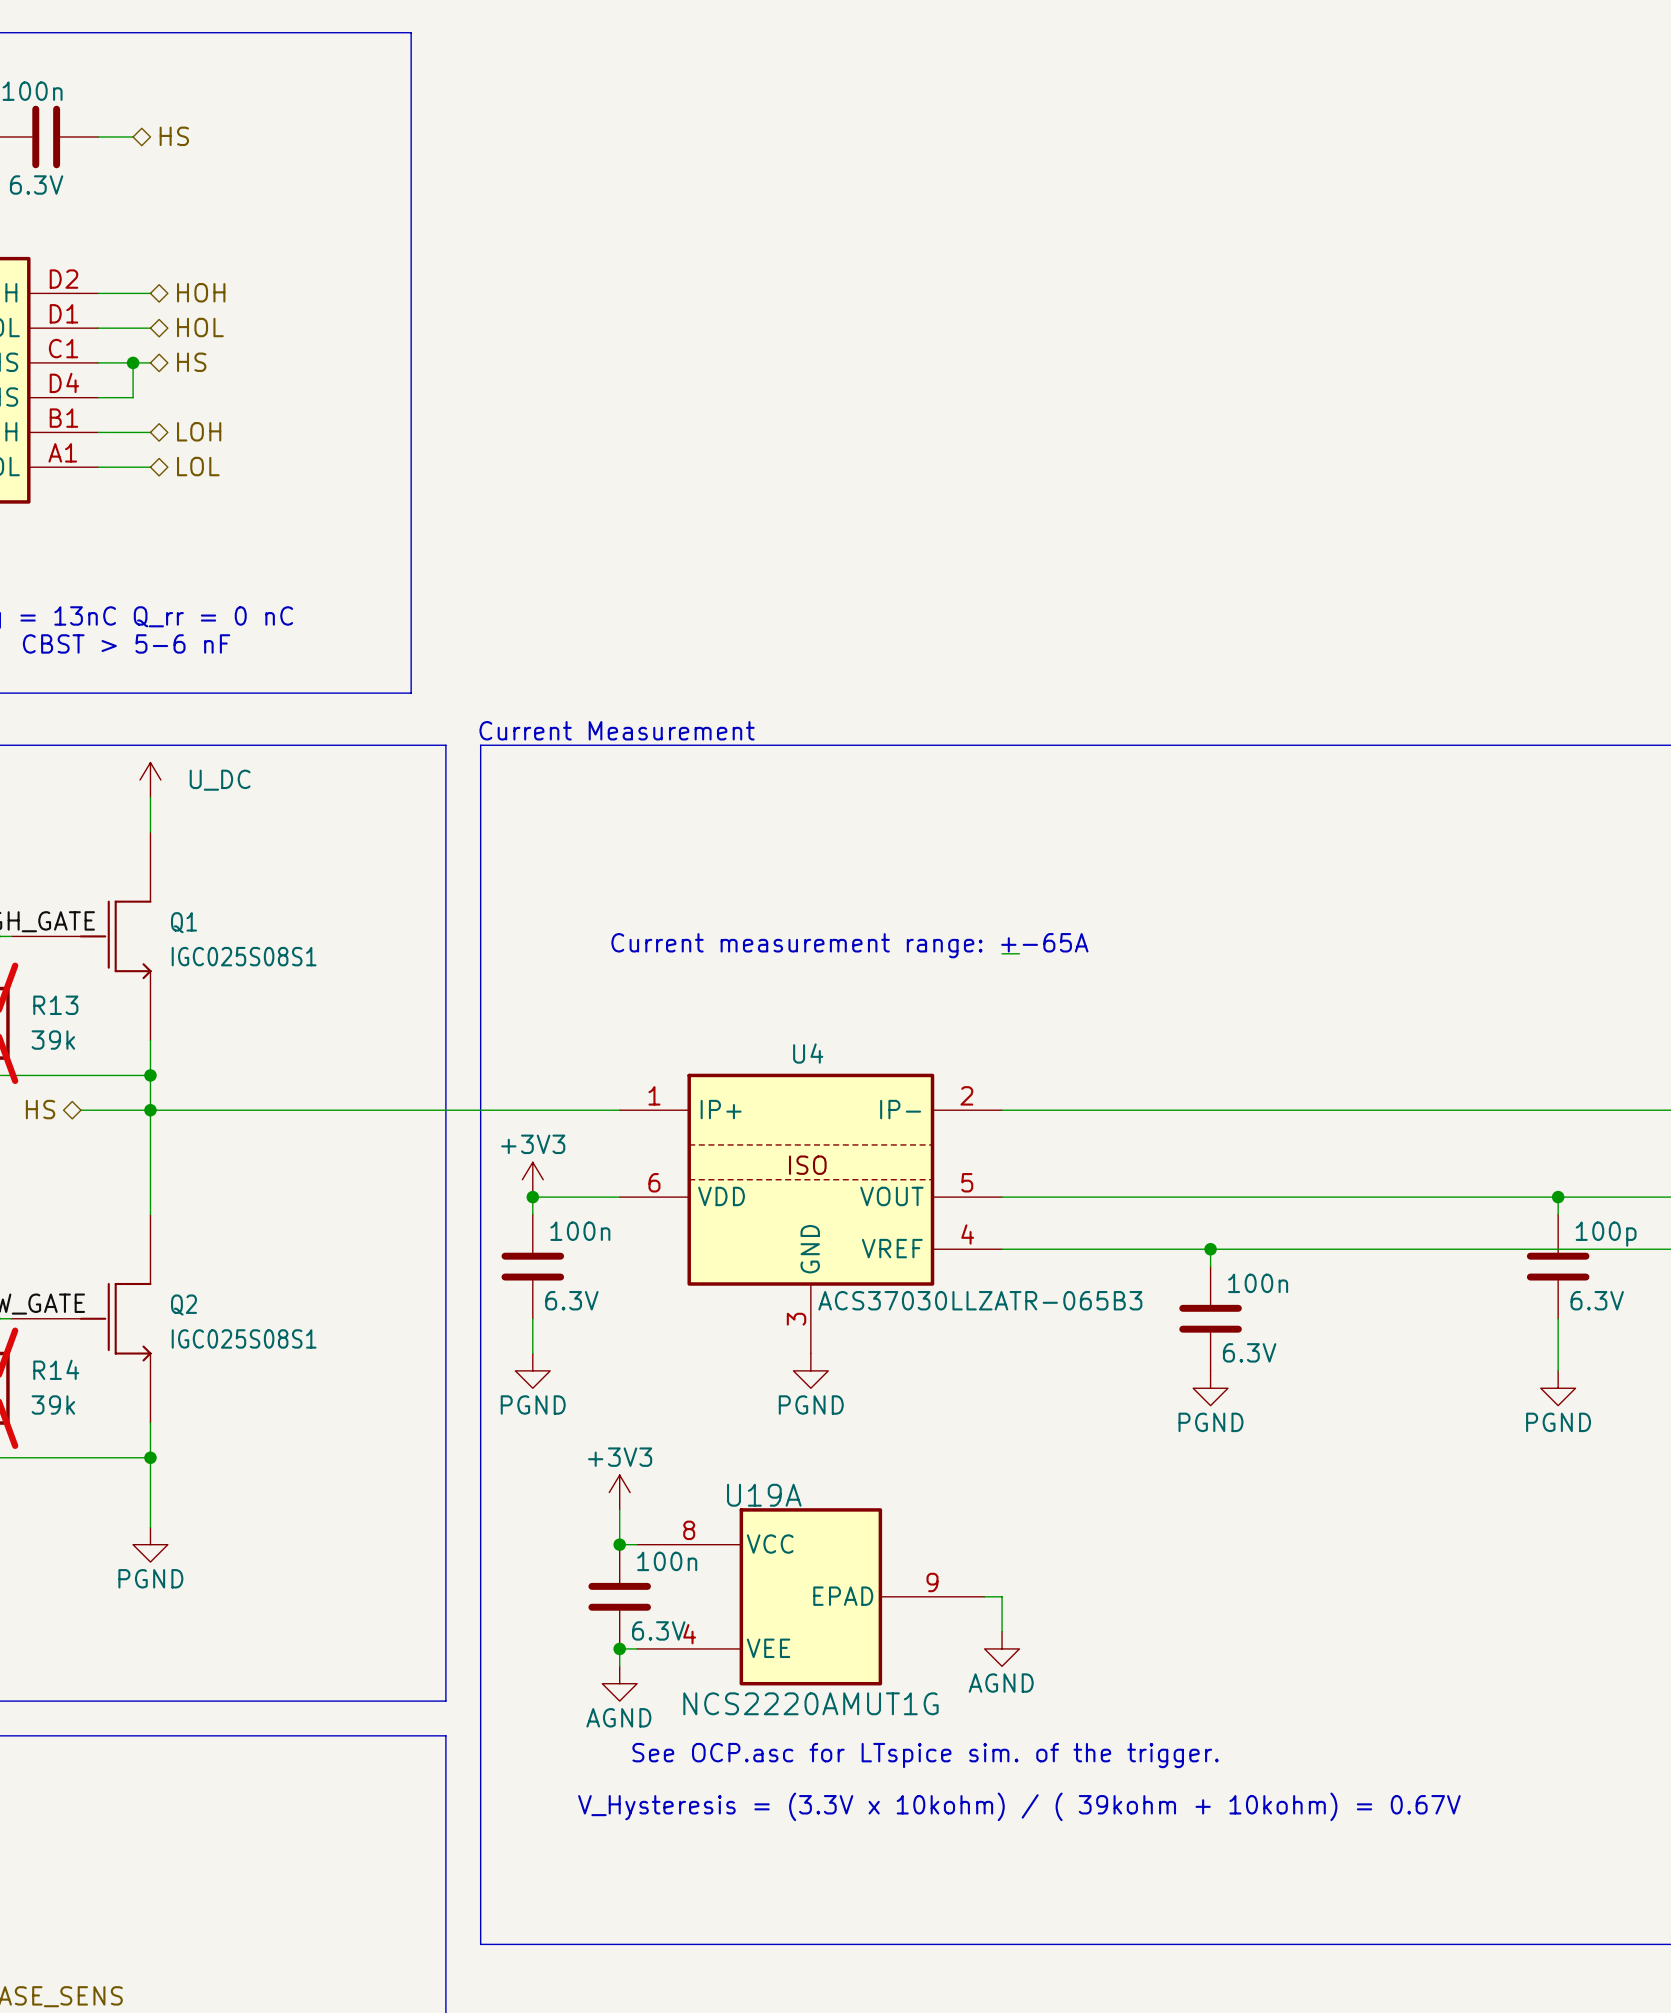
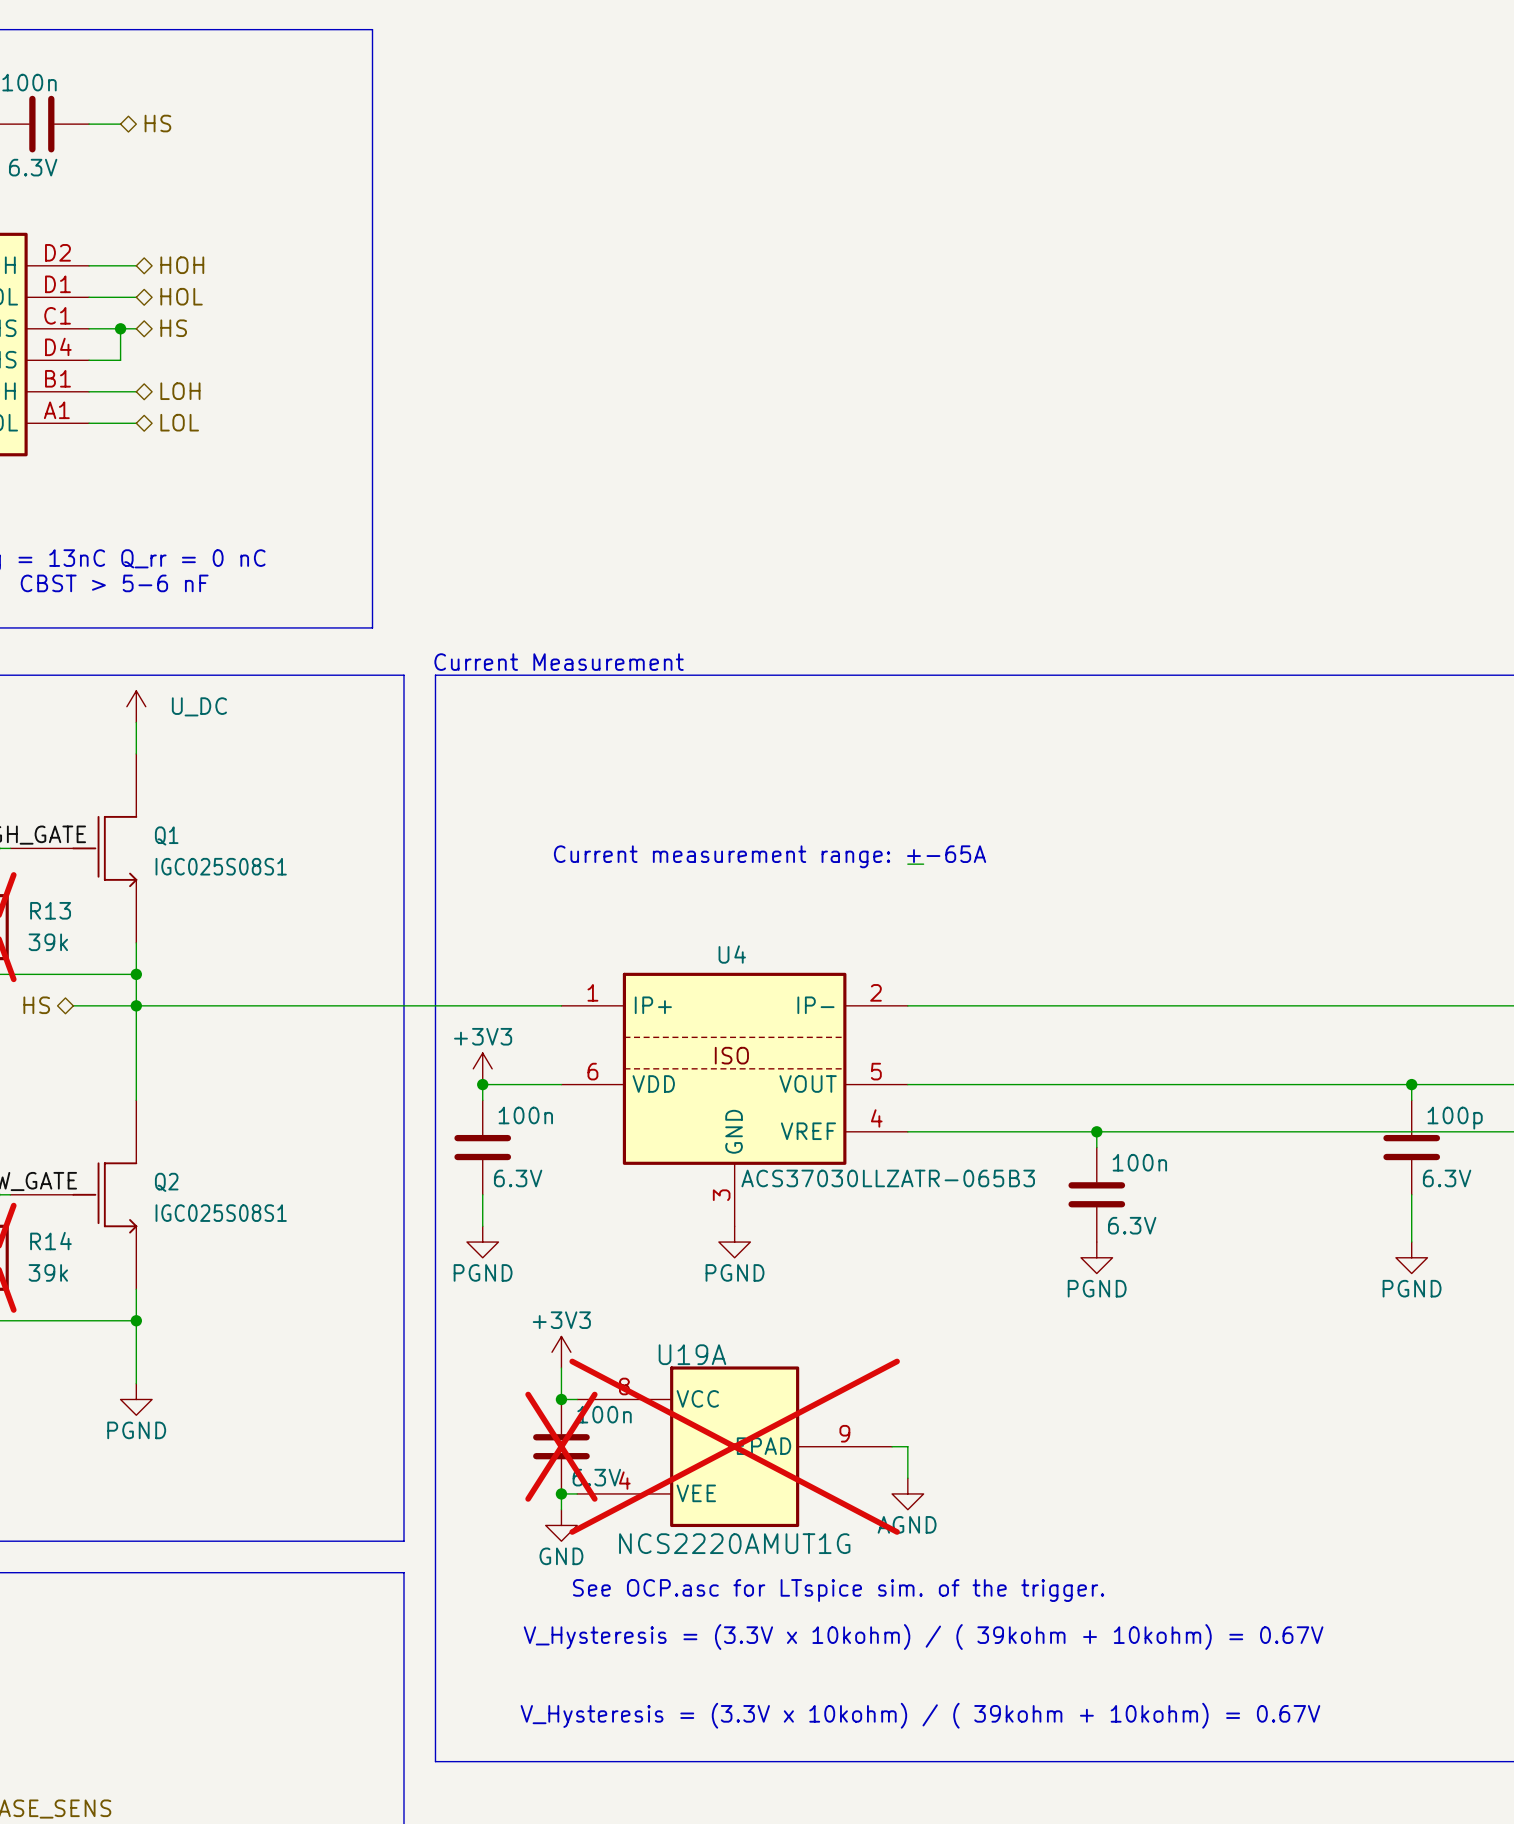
part do-not-place cross: none -> (561, 1446)
U19A do-not-place cross: none -> (734, 1446)
power symbol: AGND (619, 1683) -> GND (561, 1525)
text: none -> V_Hysteresis = (3.3V x 10kohm) / ( 39kohm + 10kohm) = 0.67V (920, 1715)

